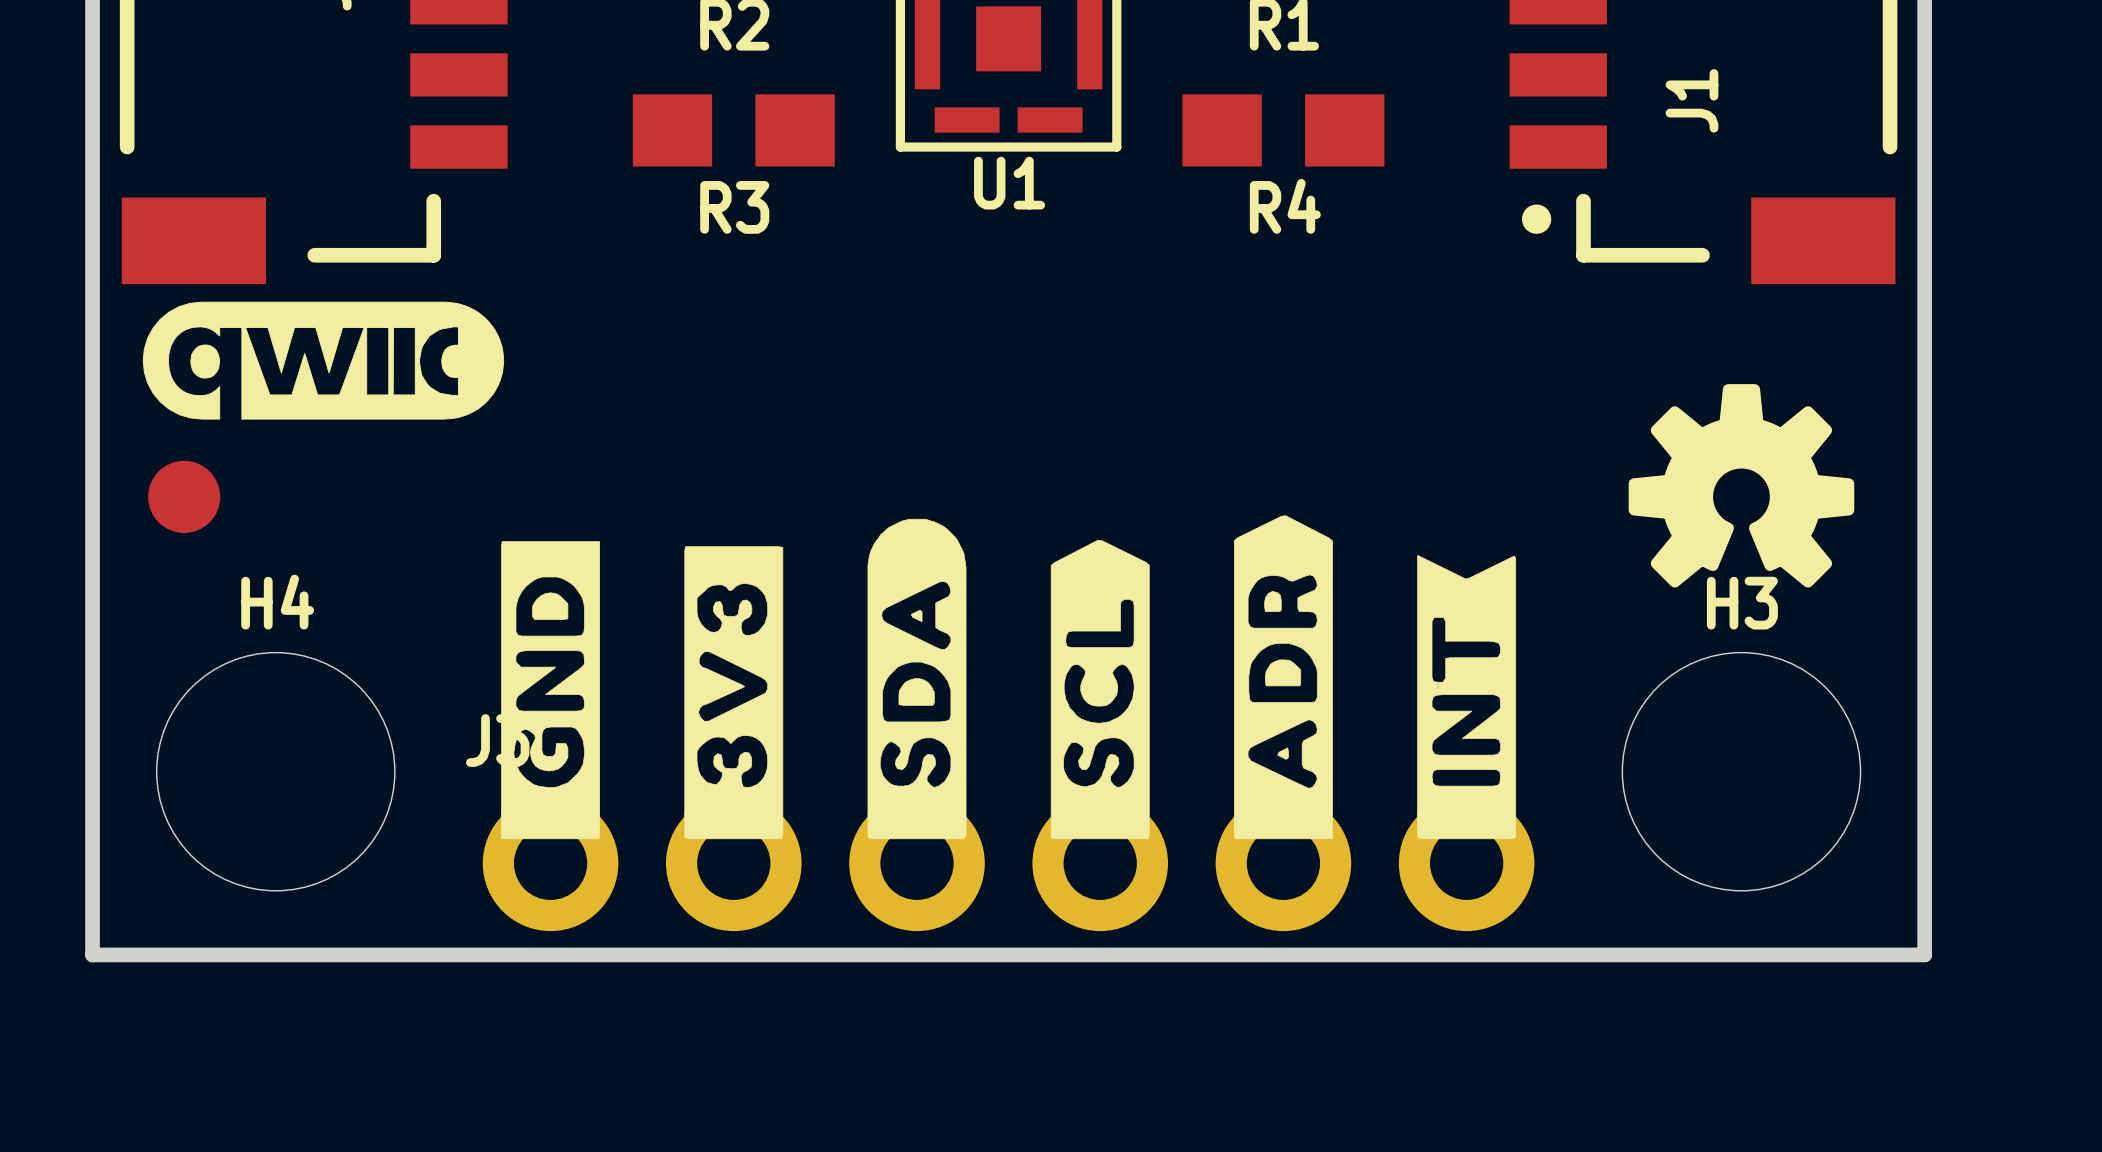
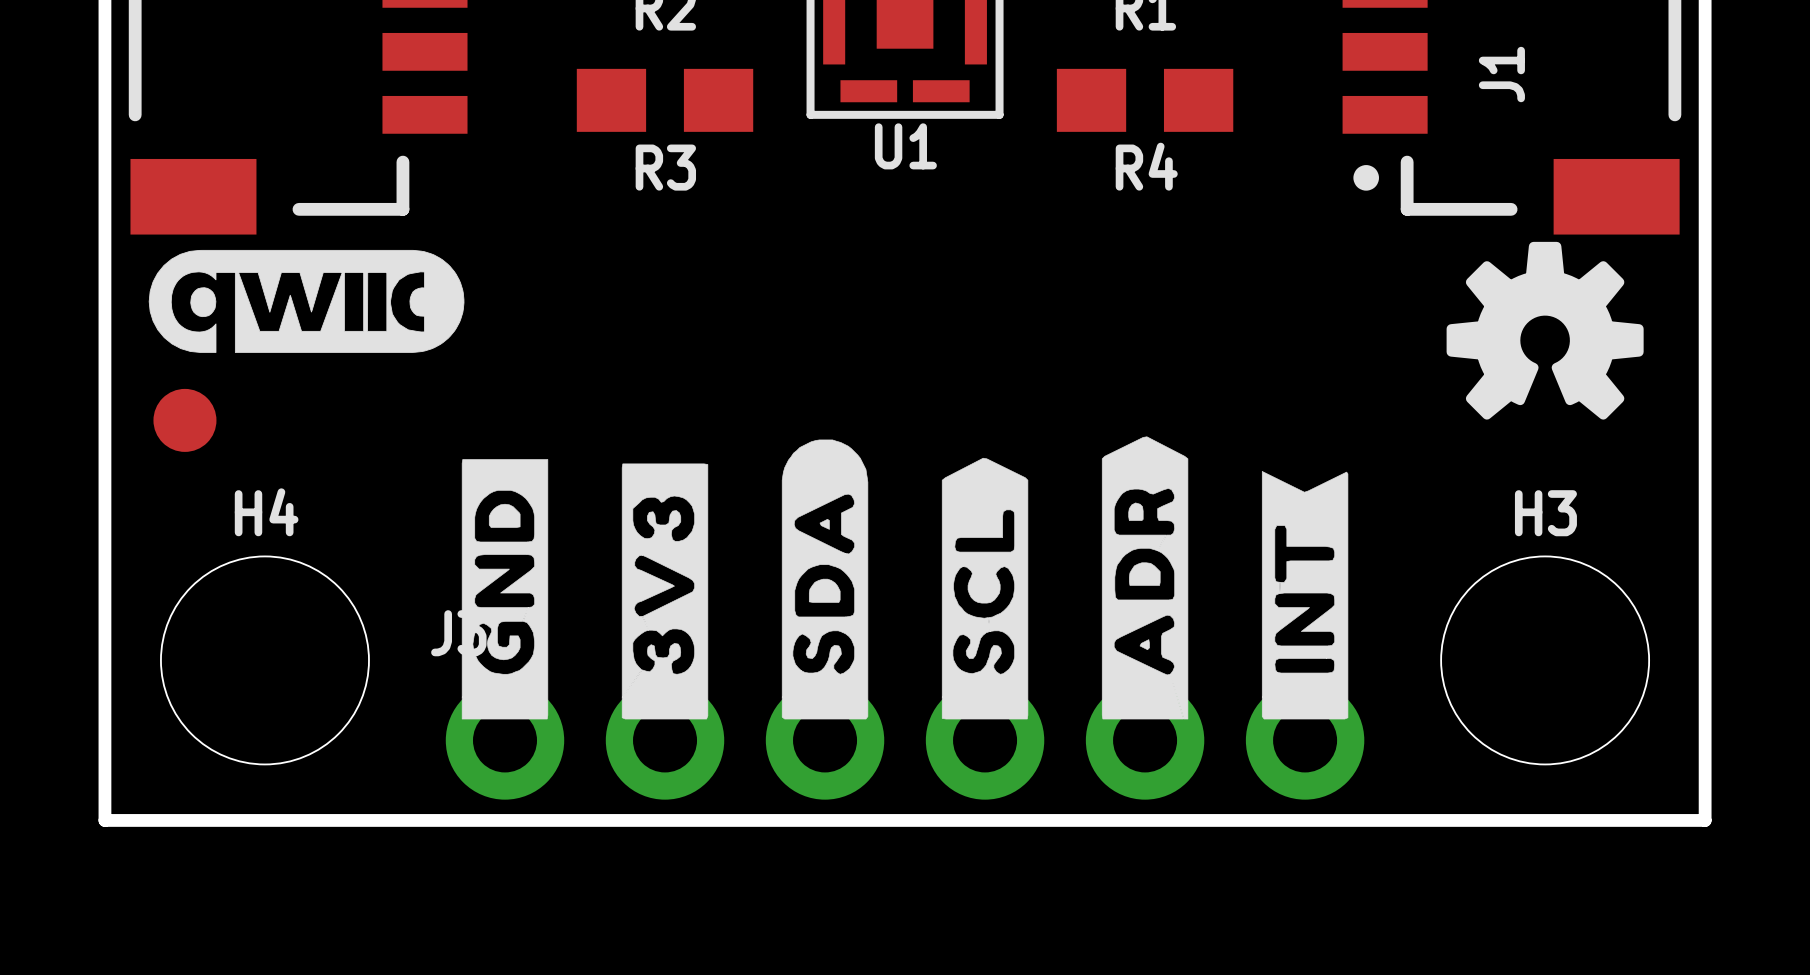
drawing position: (1741, 485) -> (1545, 330)

